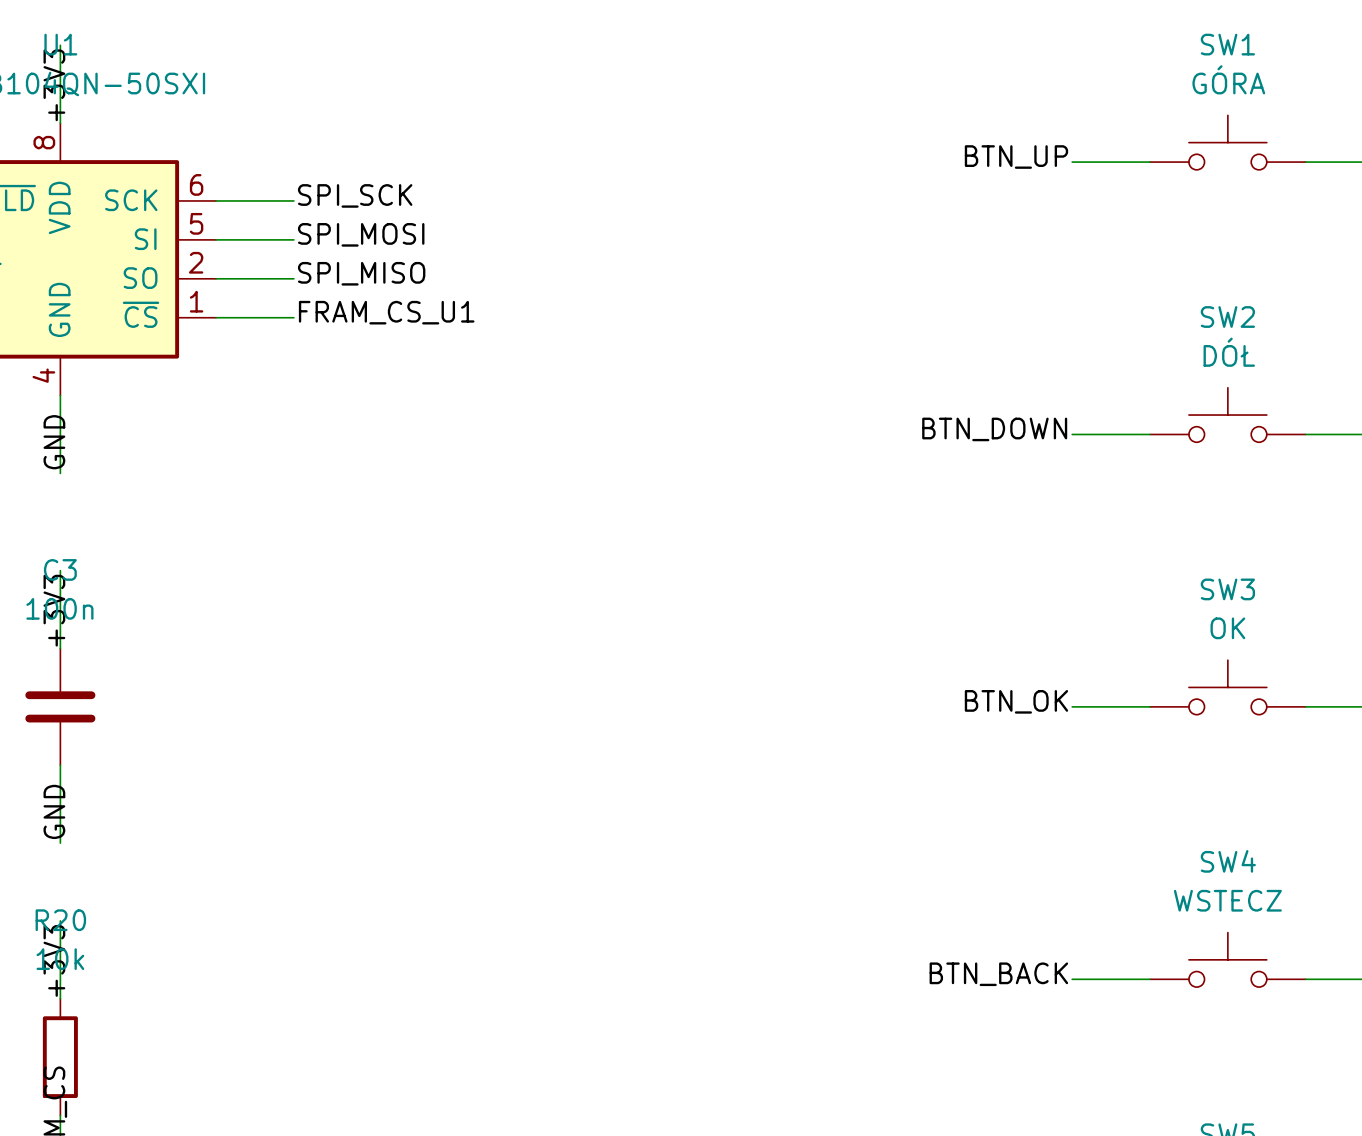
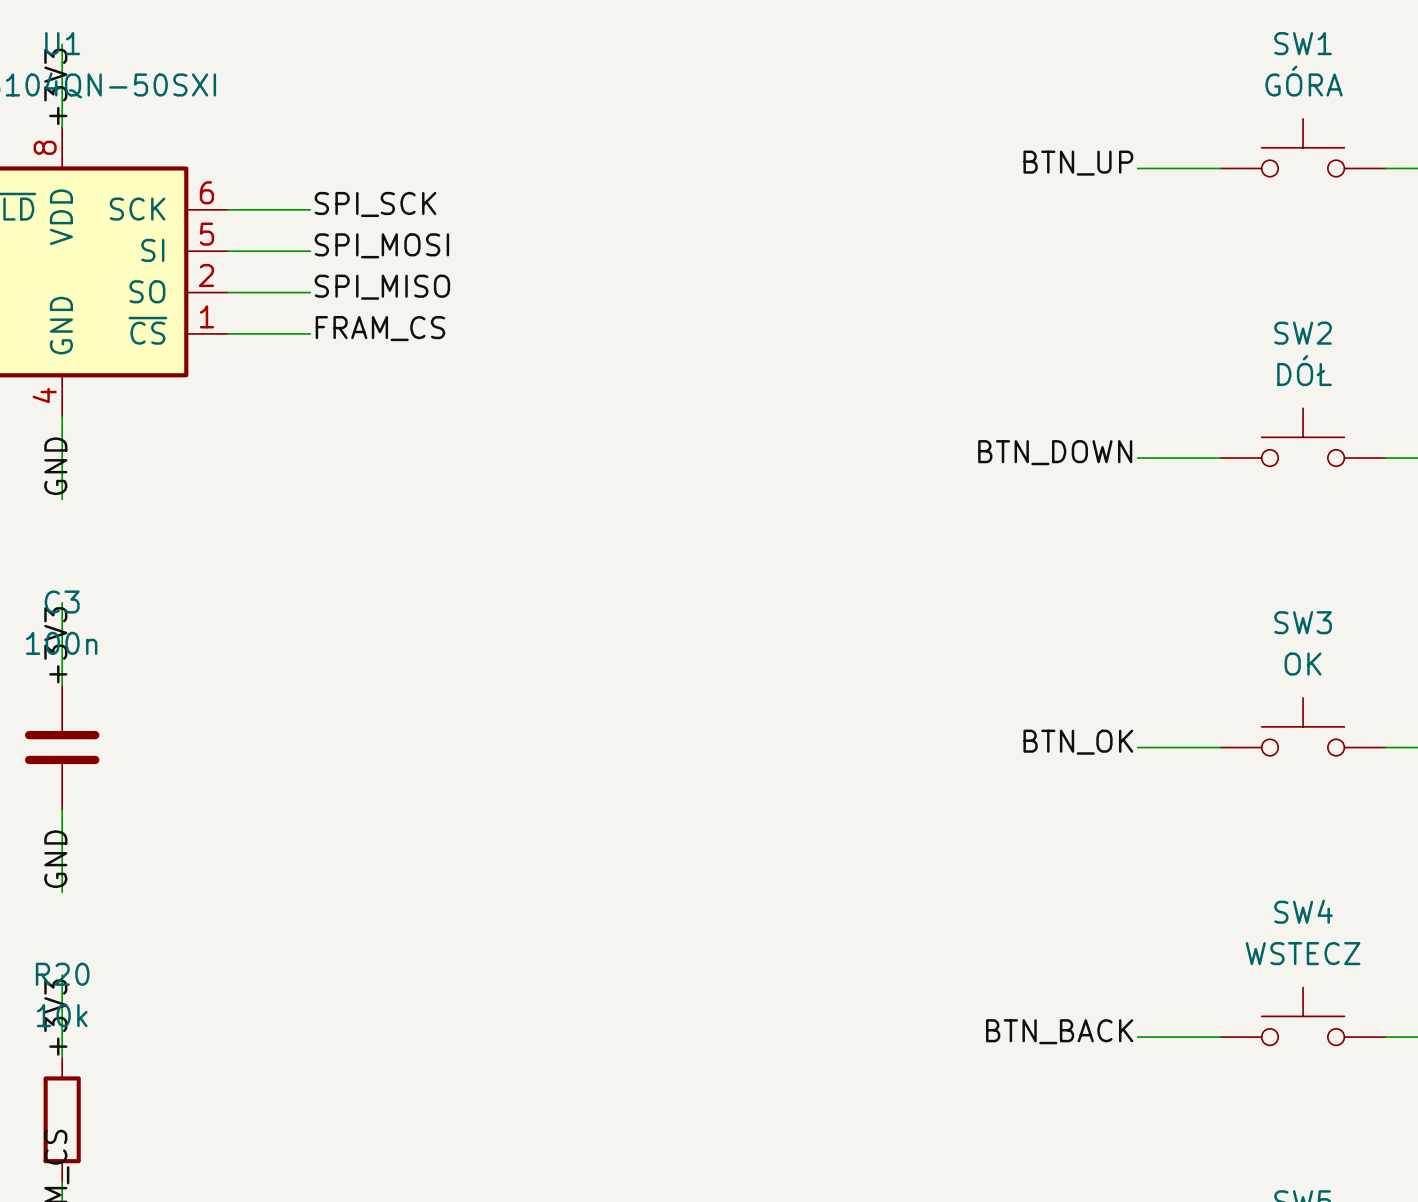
label: FRAM_CS_U1 (386, 312) -> FRAM_CS (380, 328)

